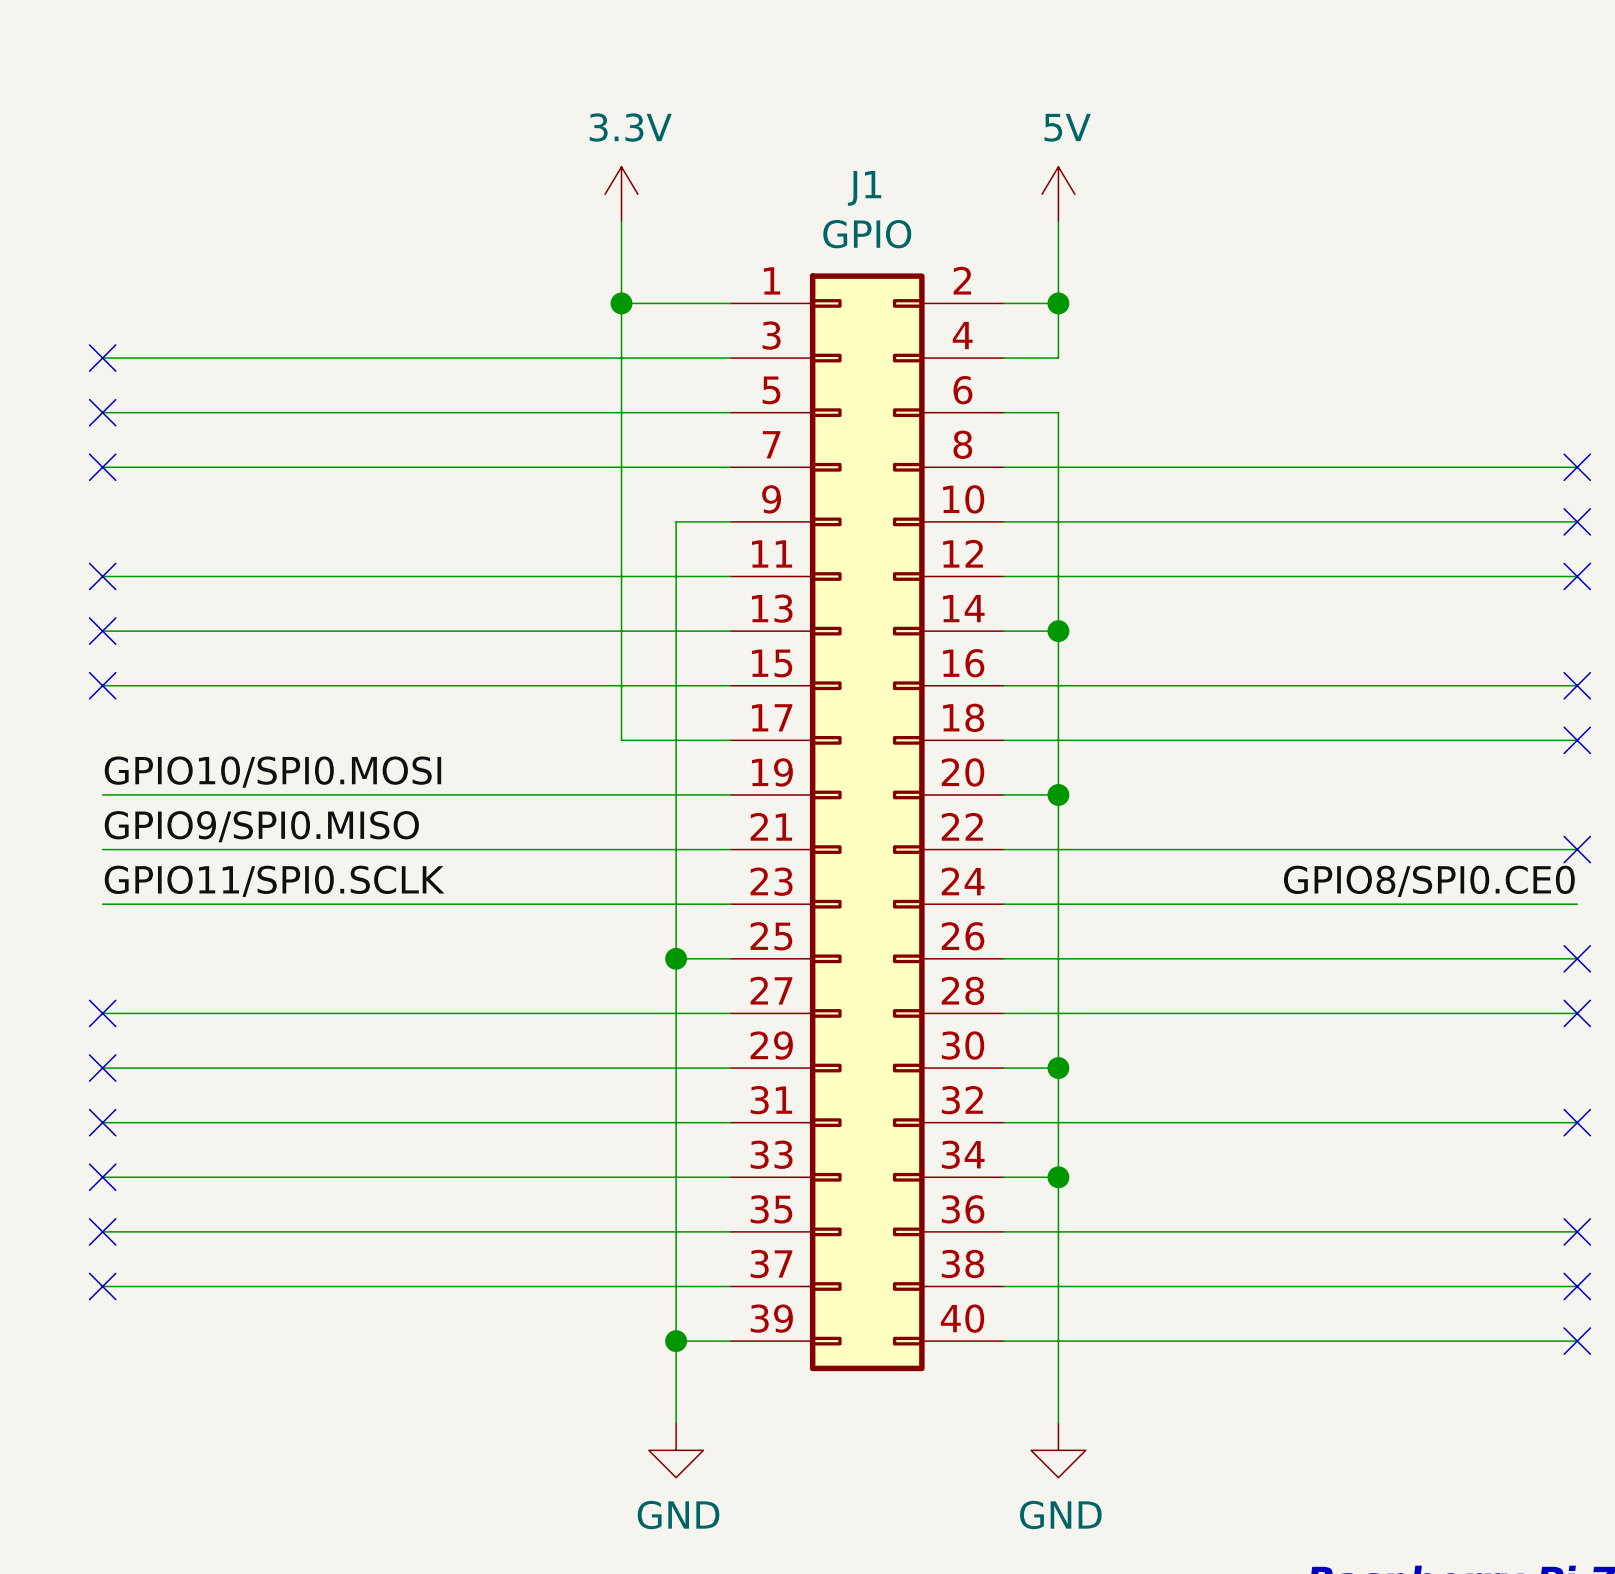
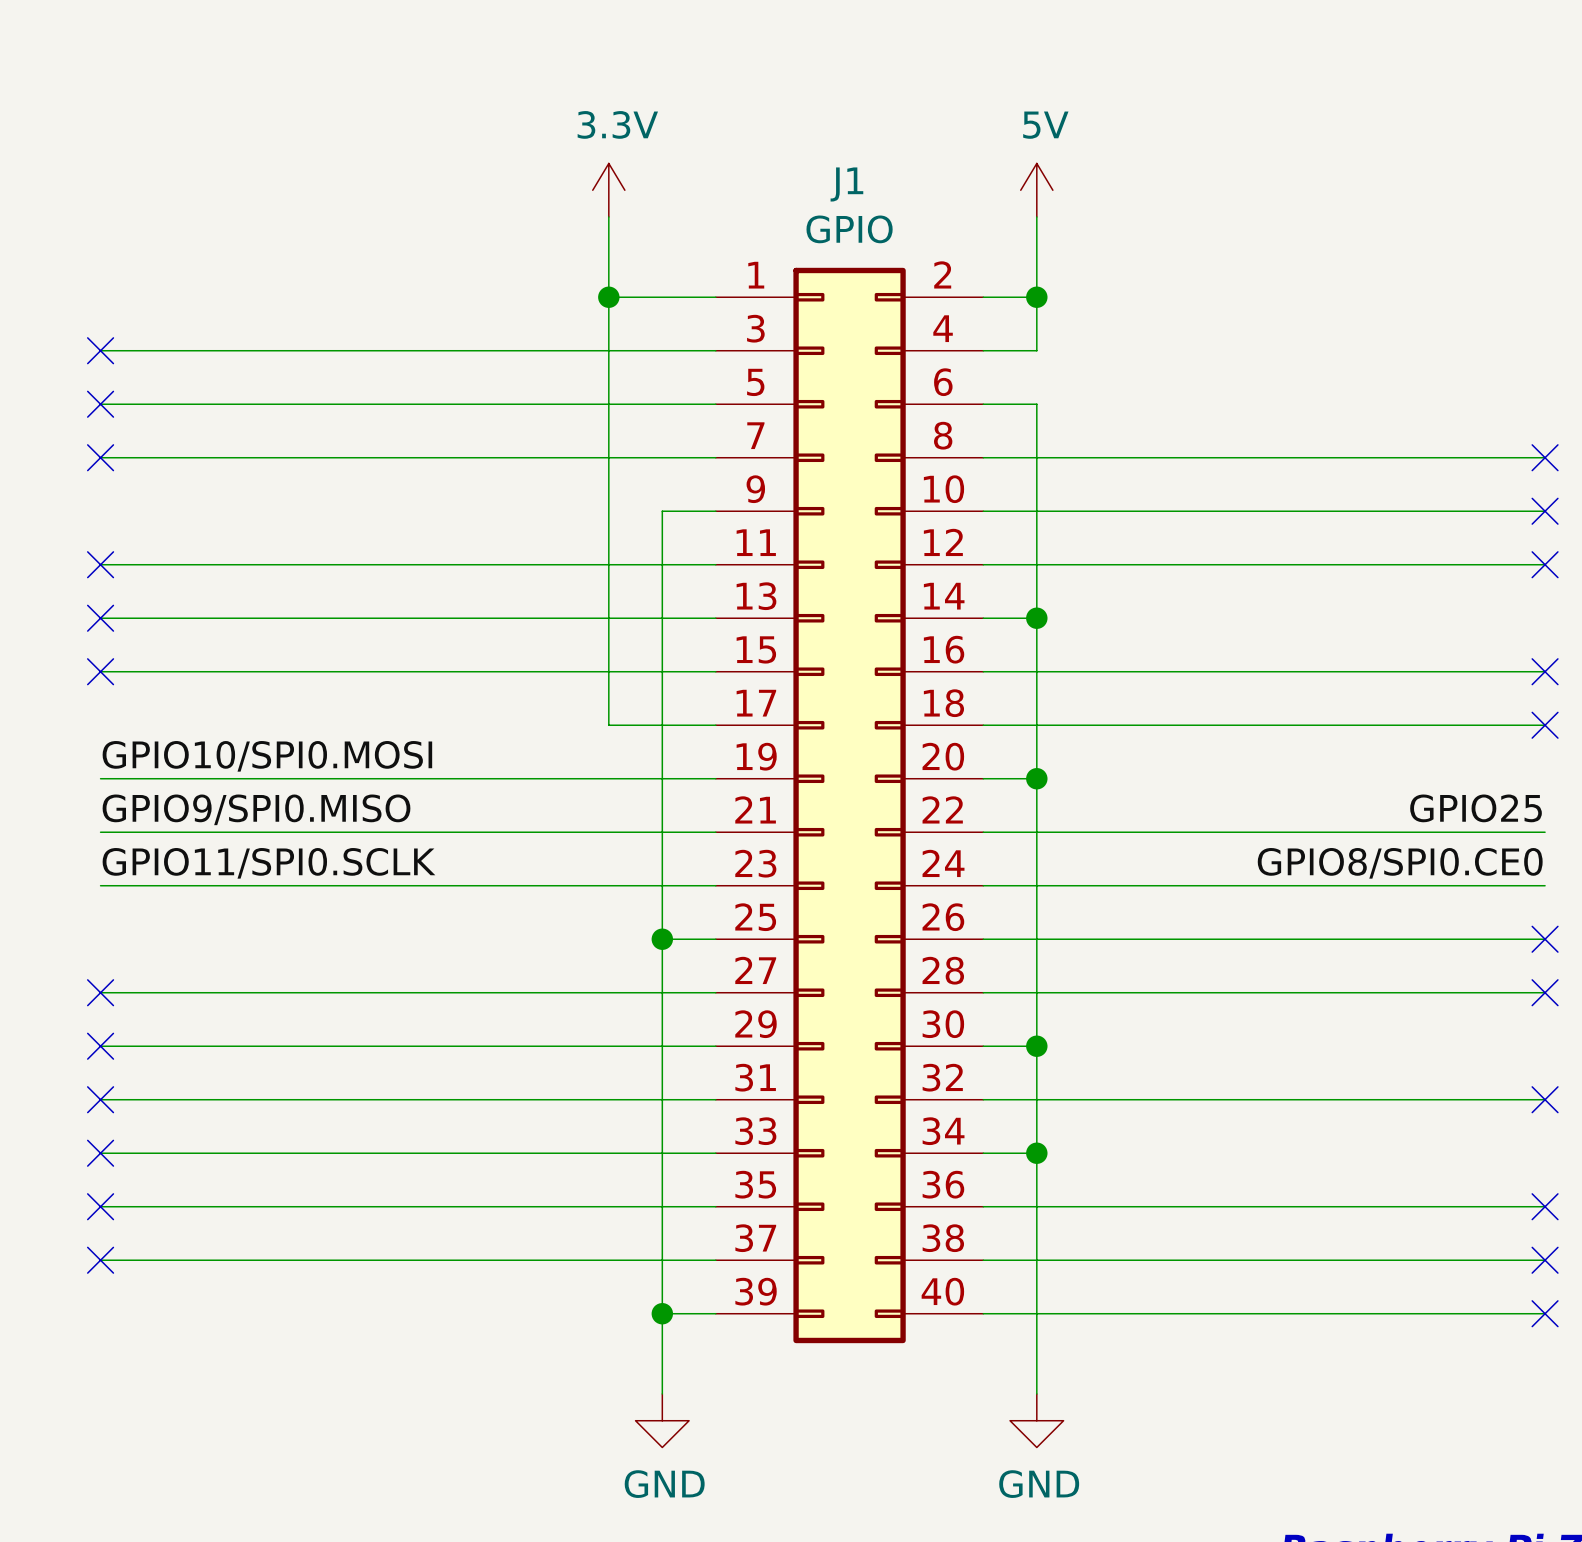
label: none -> GPIO25 (1476, 808)
no-connect mark: (1577, 849) -> none

